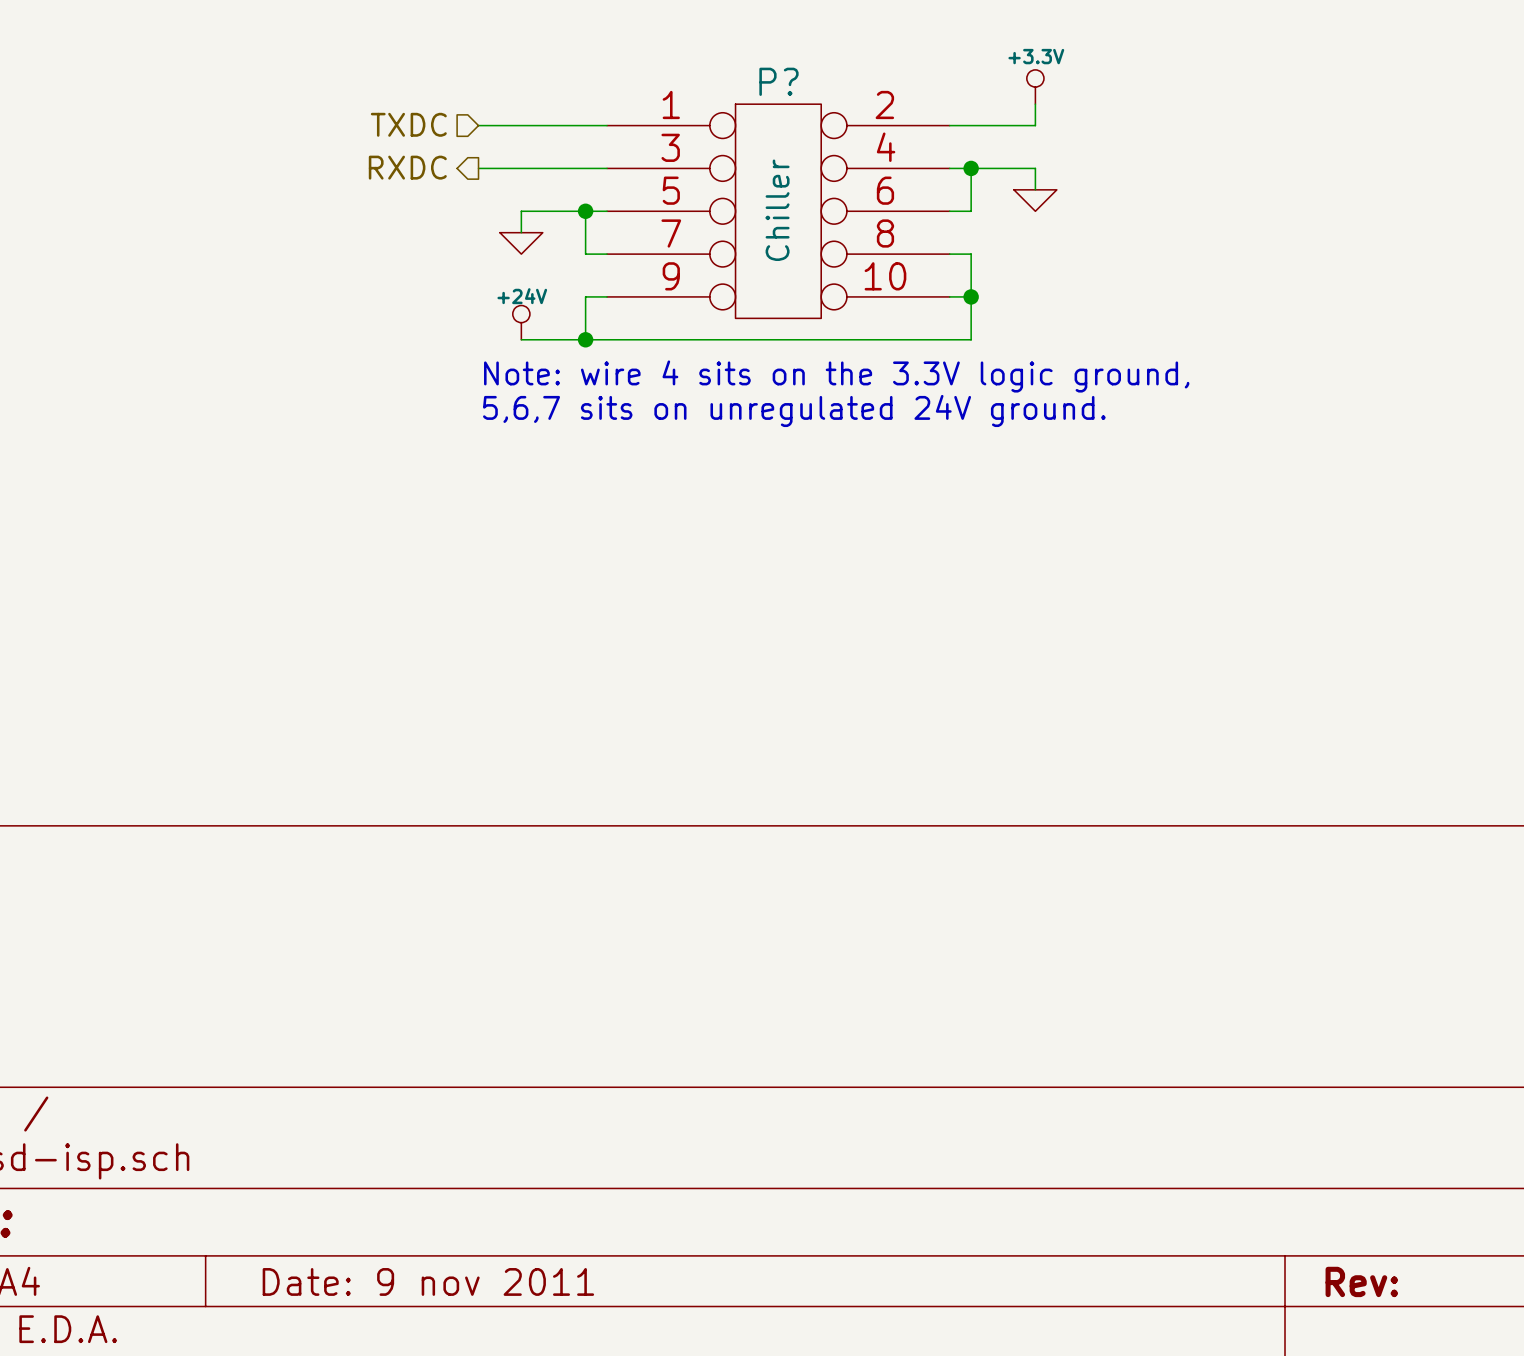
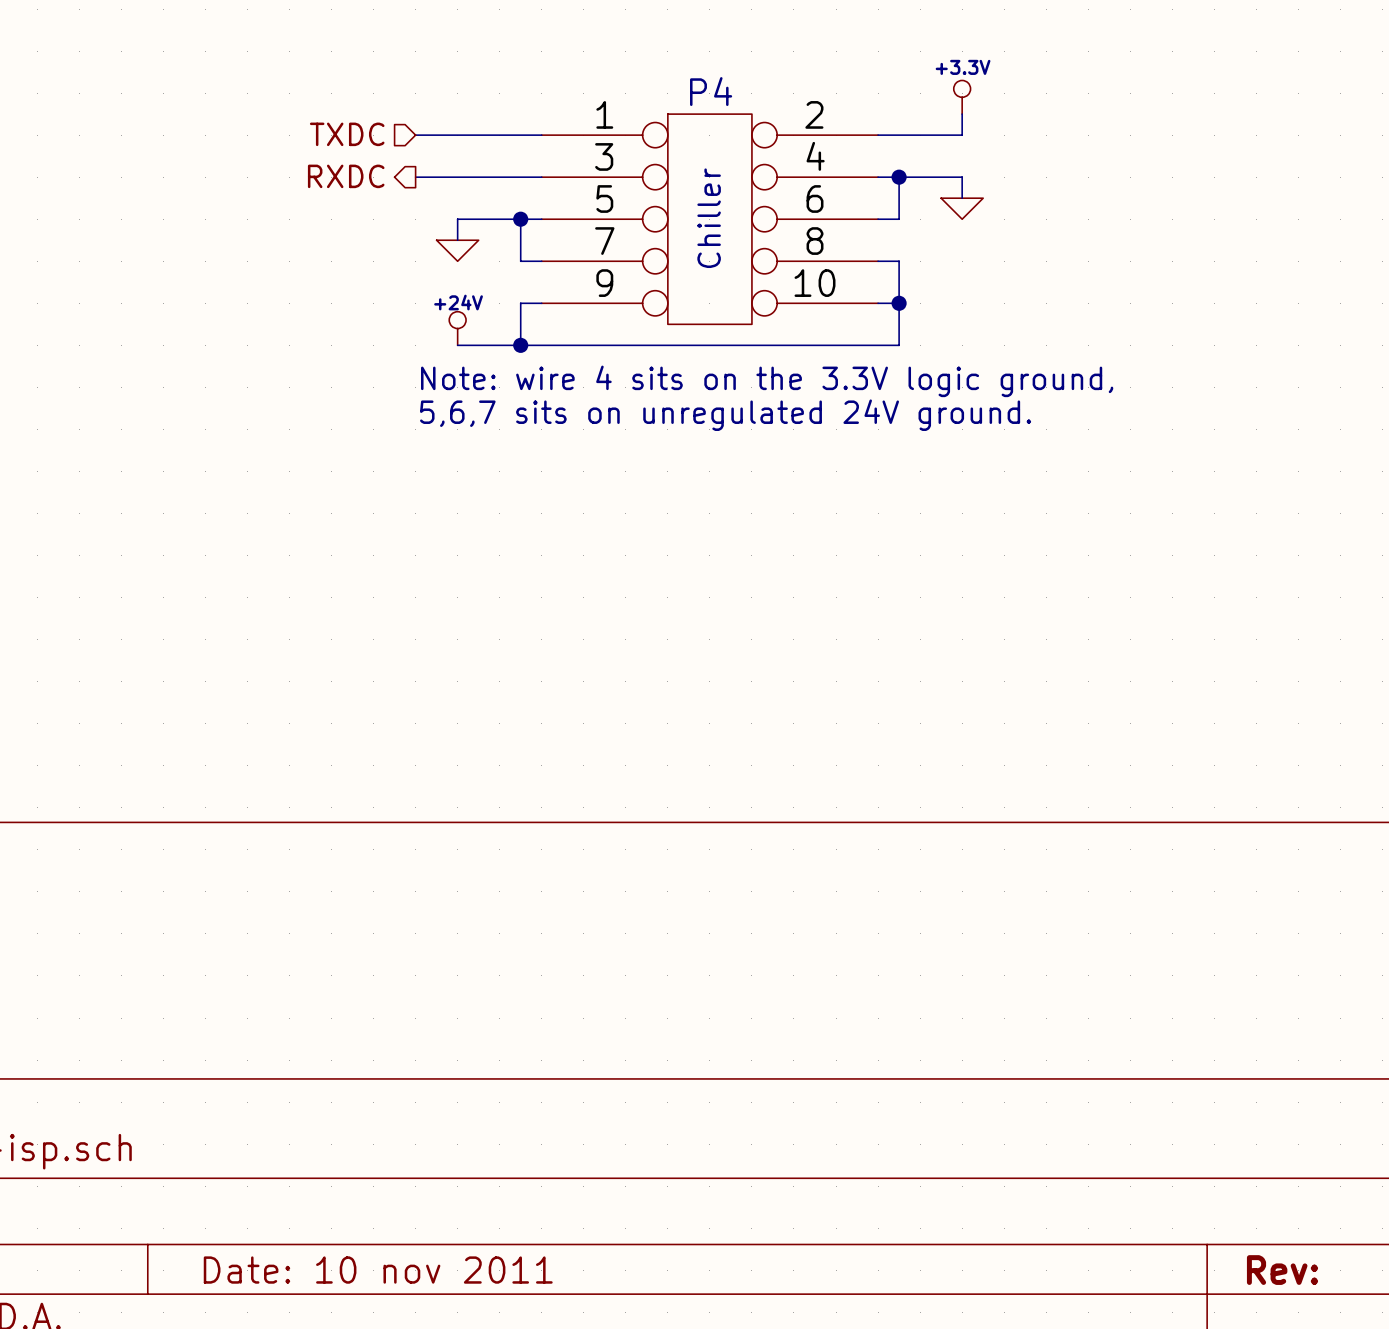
P? name: P? (778, 81) -> P4 (711, 91)
title block: Date: 9 nov 2011 (428, 1281) -> Date: 10 nov 2011 (378, 1270)

